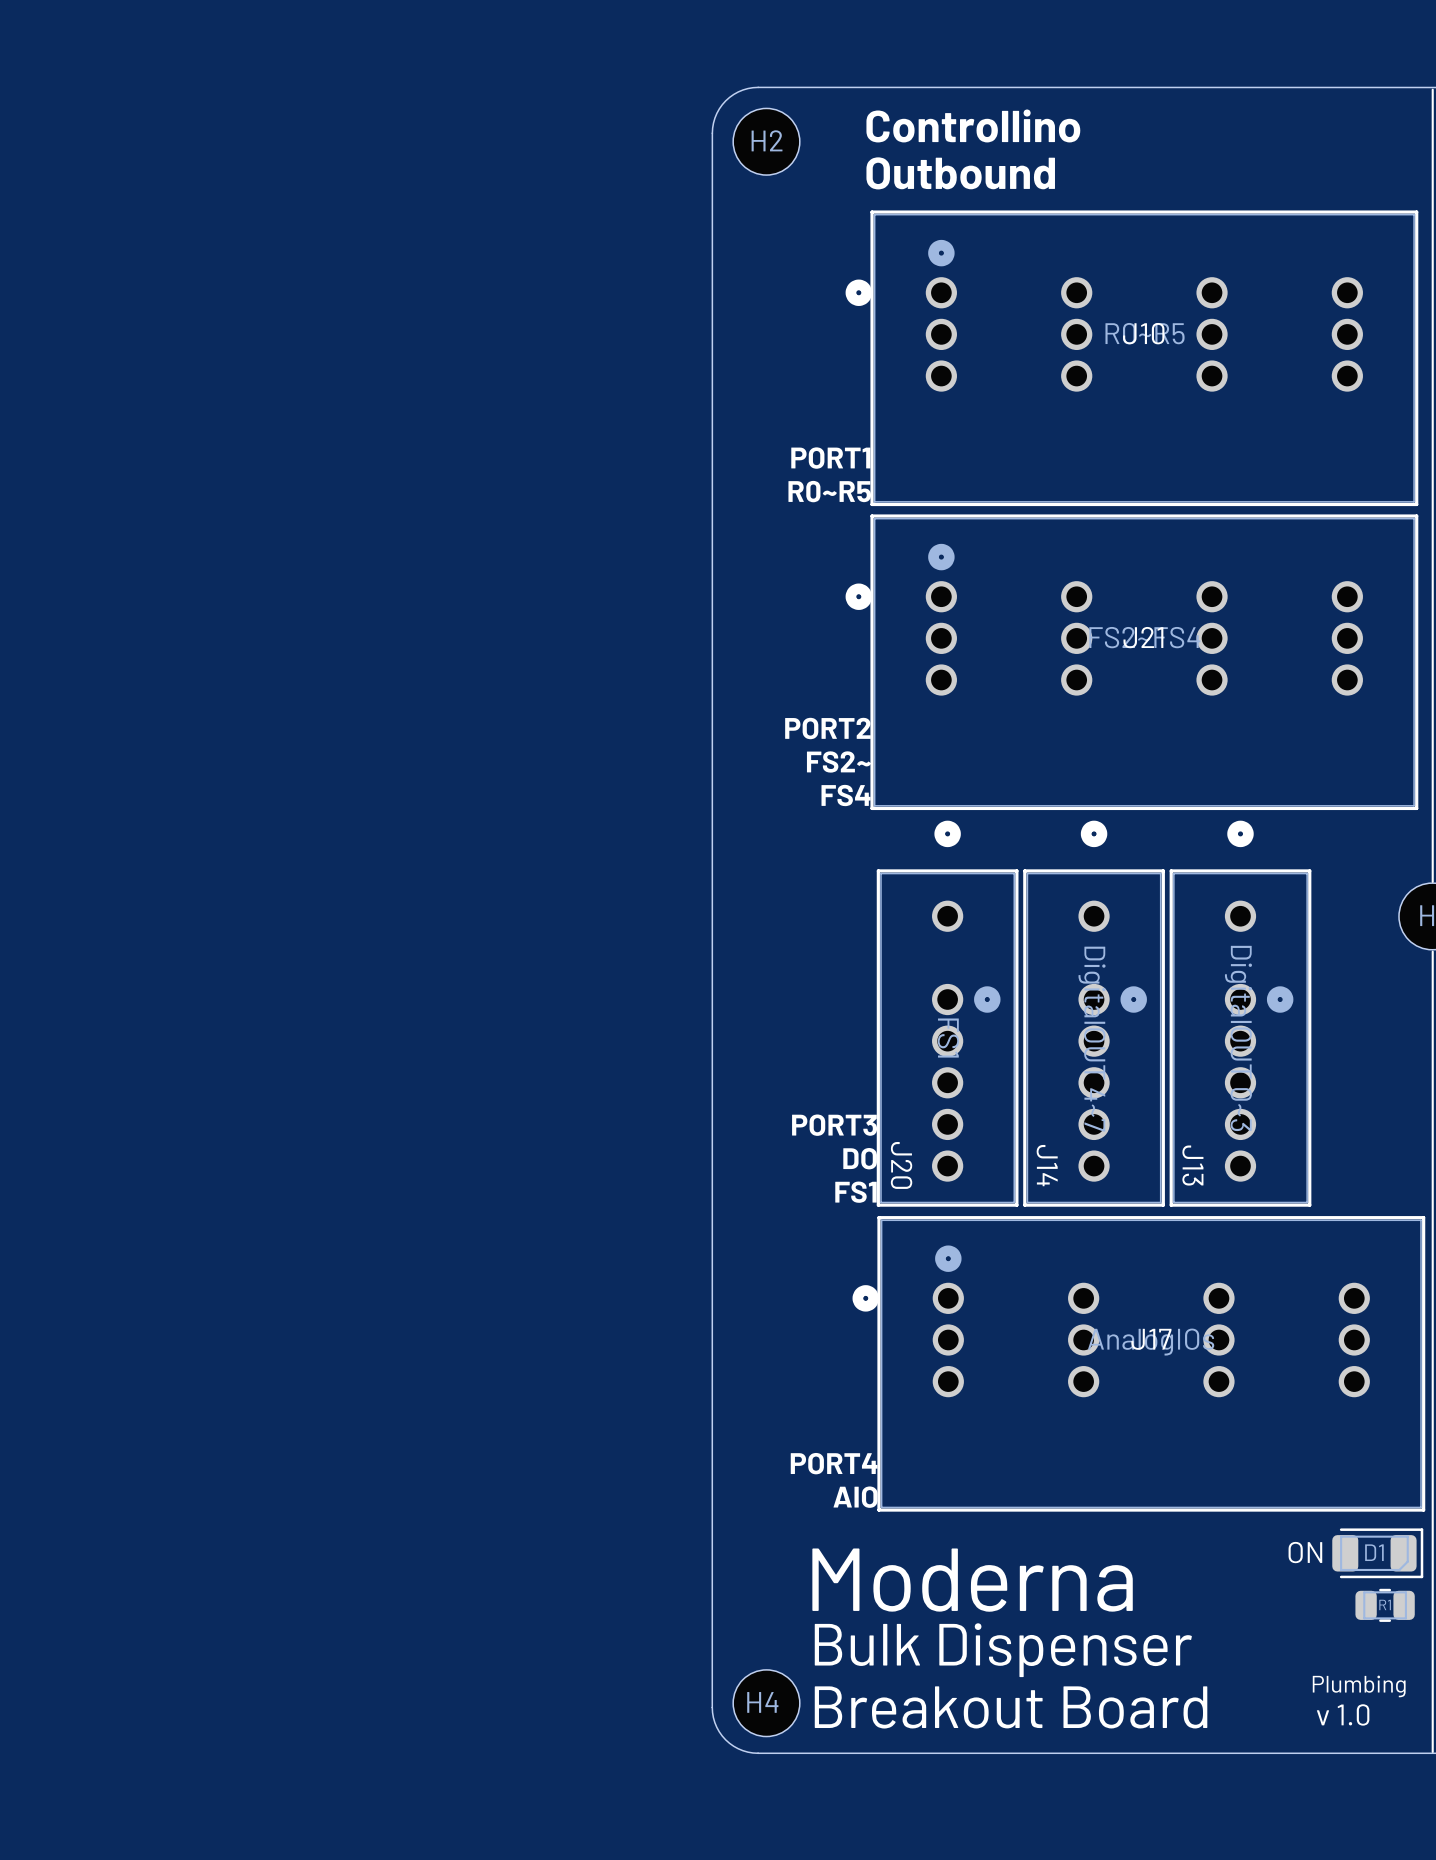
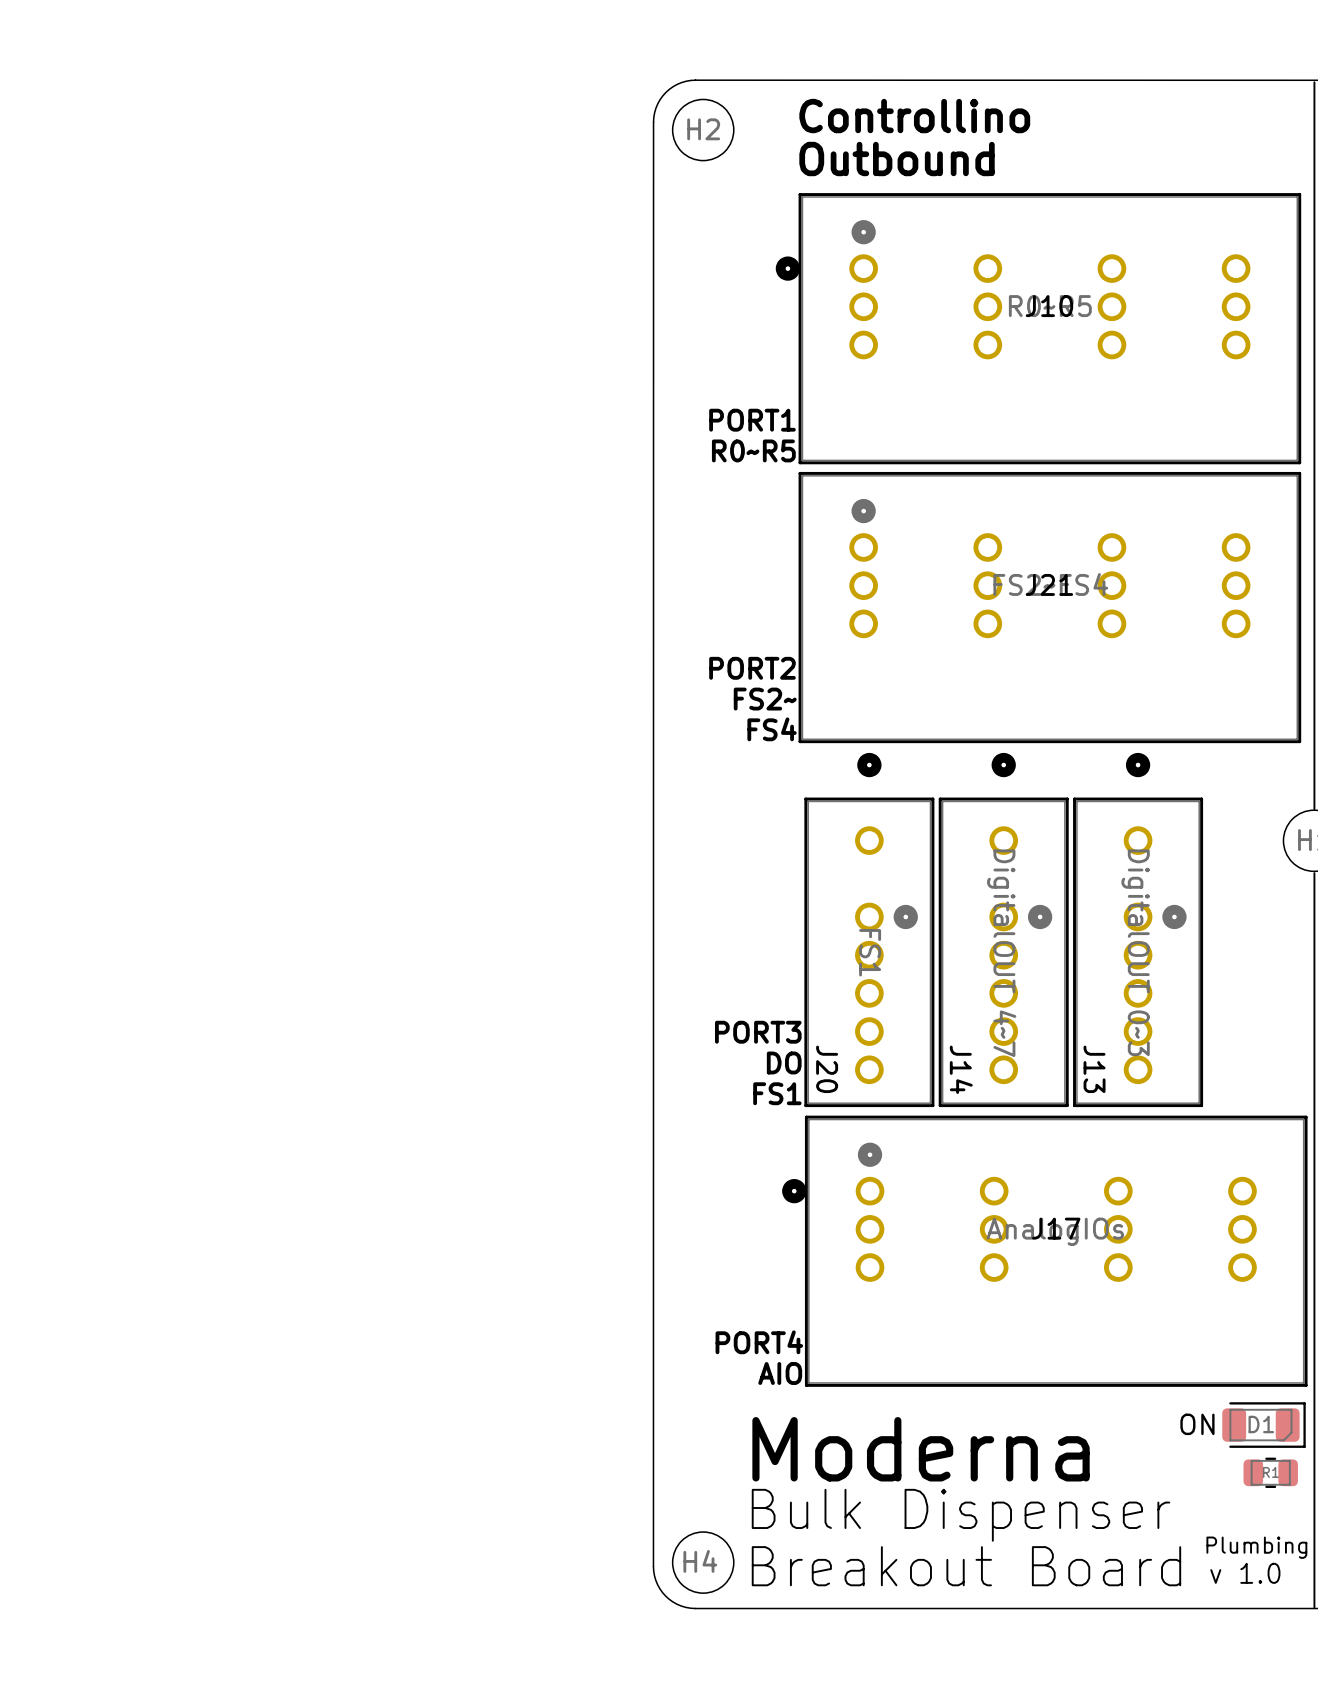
J21 footprint: [845, 514, 1419, 811] -> [798, 471, 1302, 744]

